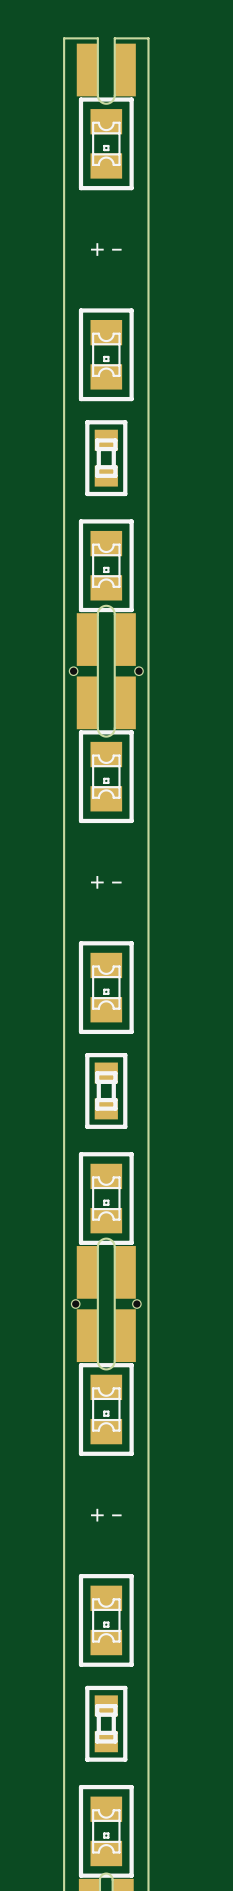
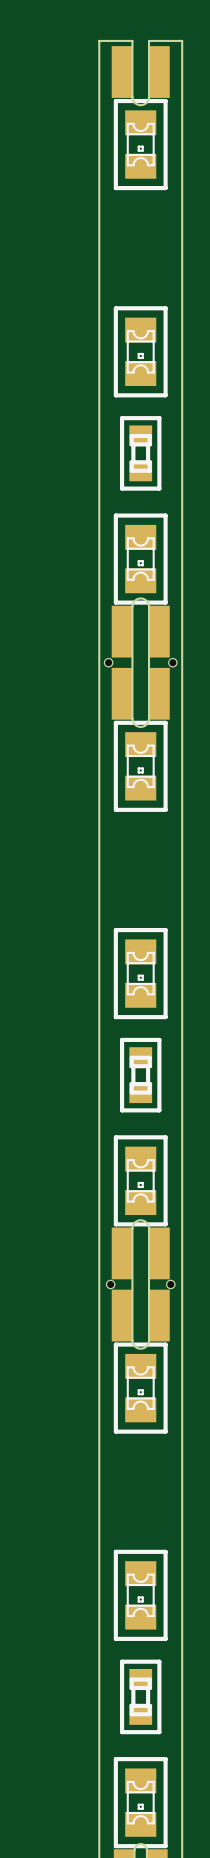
text: + - (106, 249) -> none
text: + - (106, 882) -> none
text: + - (106, 1515) -> none

